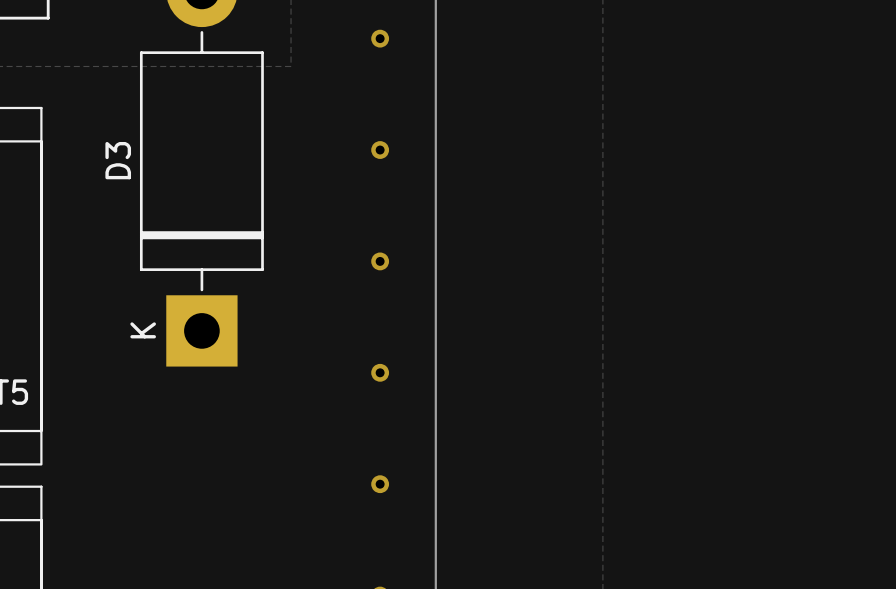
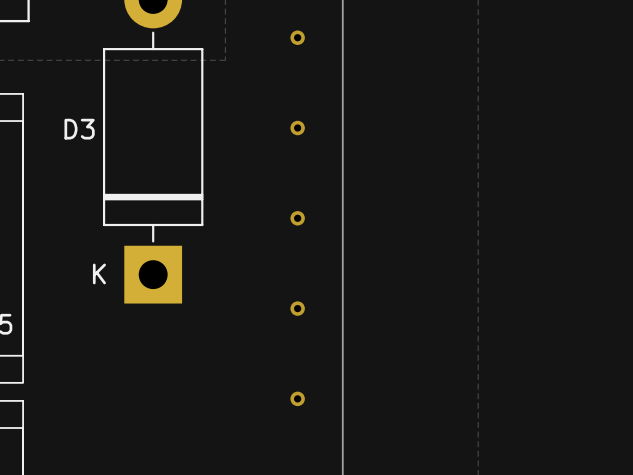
D3 name rotation: 0° (118, 160) -> 90° clockwise (79, 129)
D3 text rotation: 0° (143, 330) -> 90° clockwise (99, 273)

